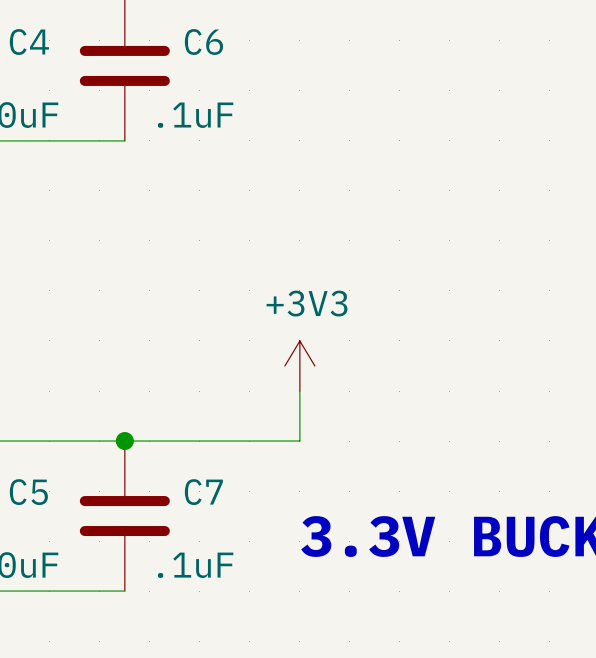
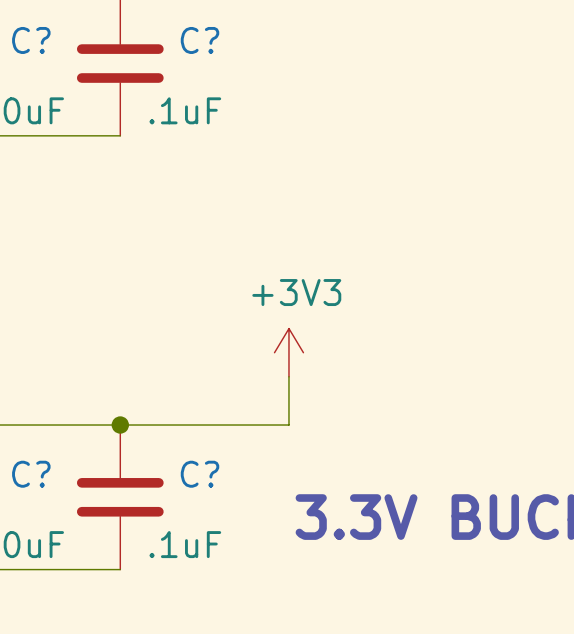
C4 name: C4 (29, 42) -> C? (31, 40)
C6 name: C6 (203, 42) -> C? (200, 40)
C5 name: C5 (28, 492) -> C? (31, 474)
C7 name: C7 (203, 492) -> C? (200, 474)

